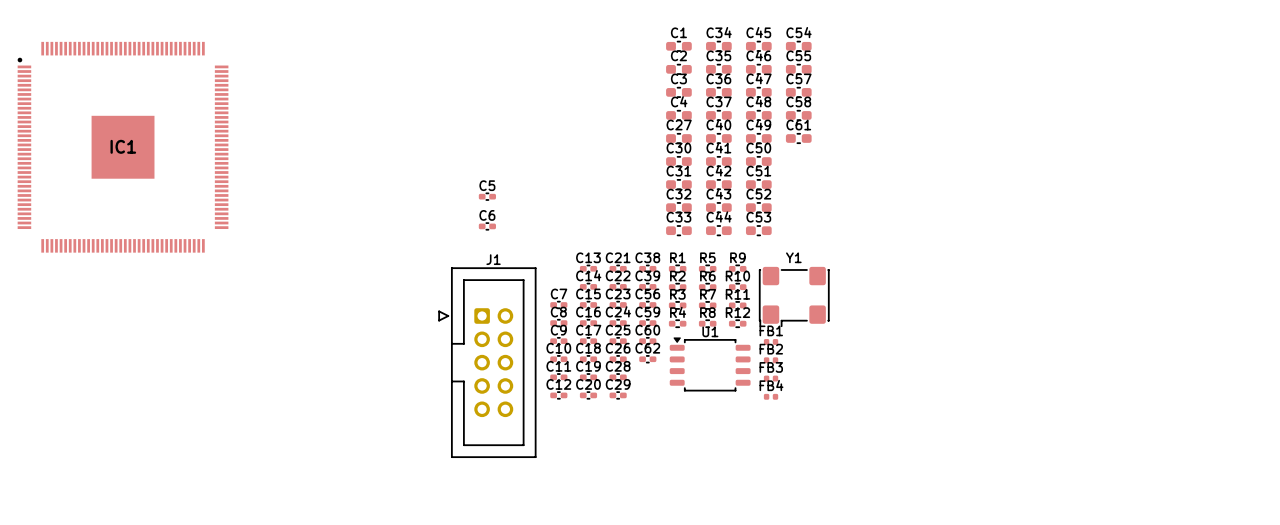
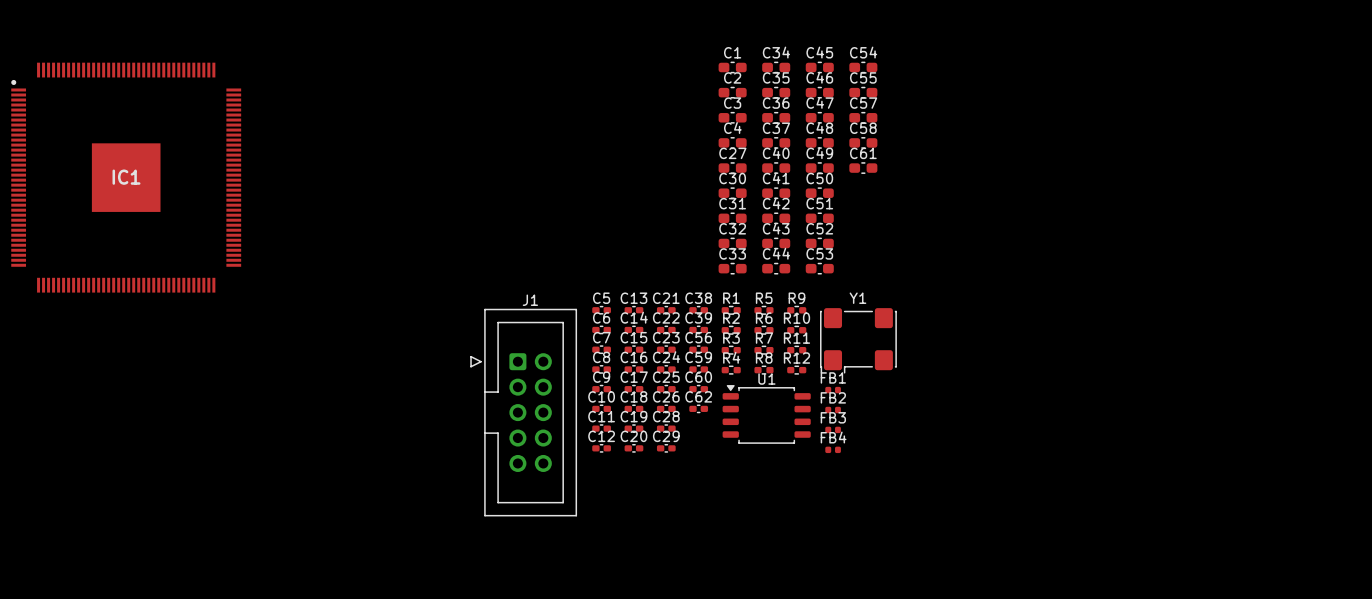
C5 position: (487, 196) -> (601, 310)
C6 position: (487, 226) -> (601, 329)

